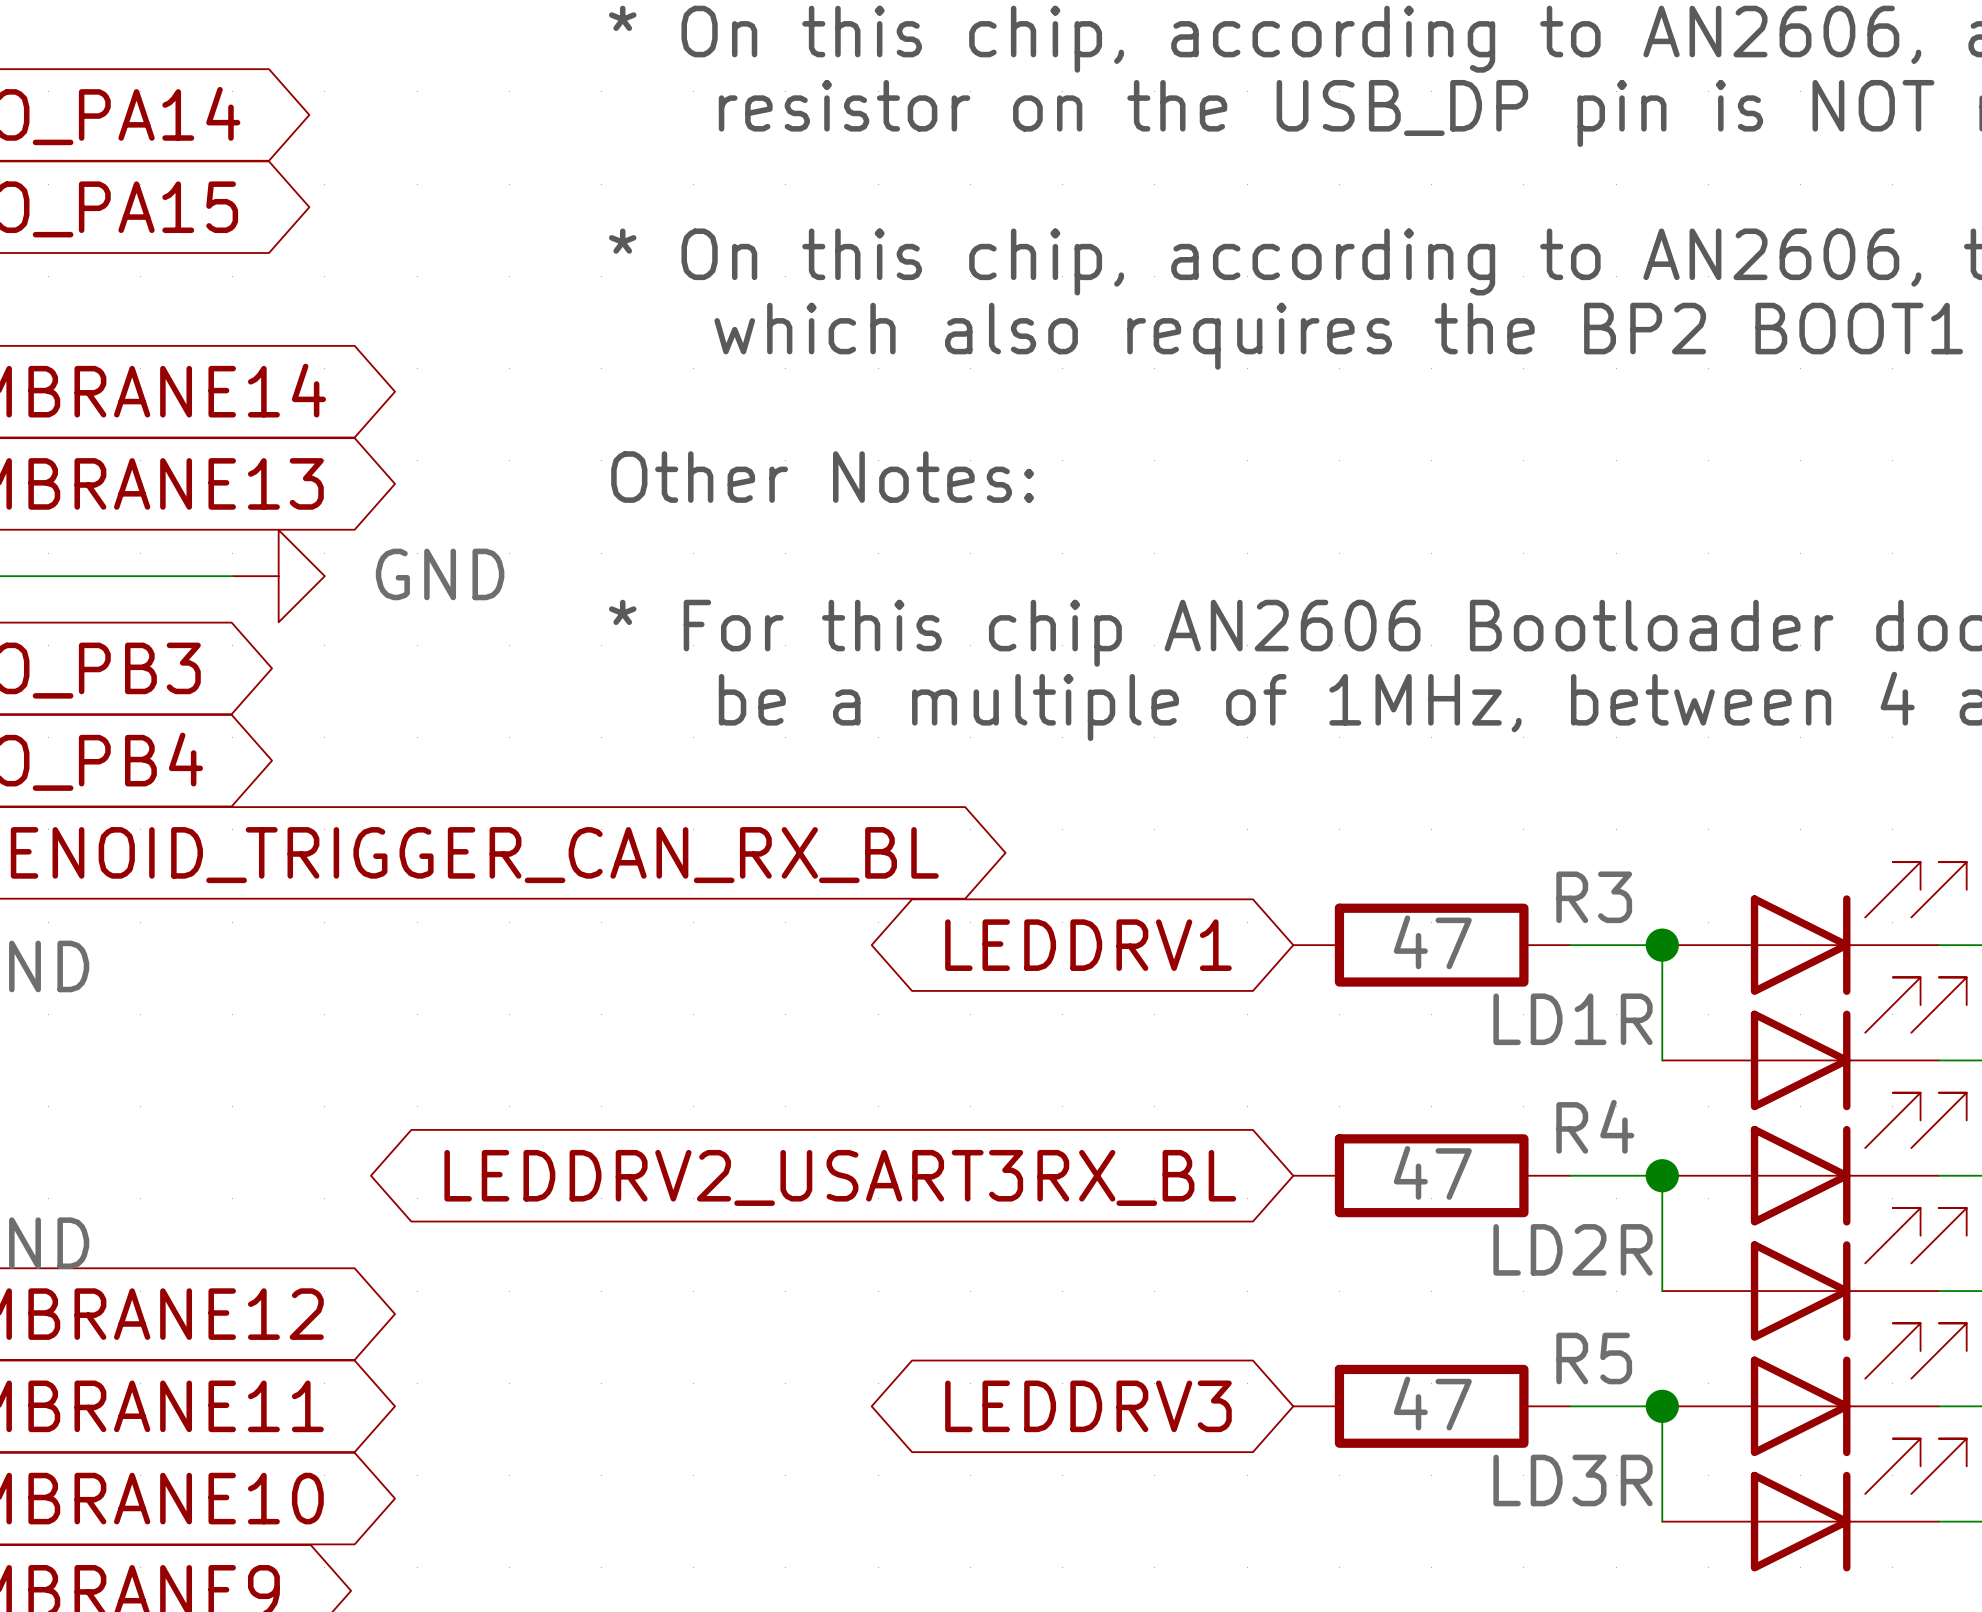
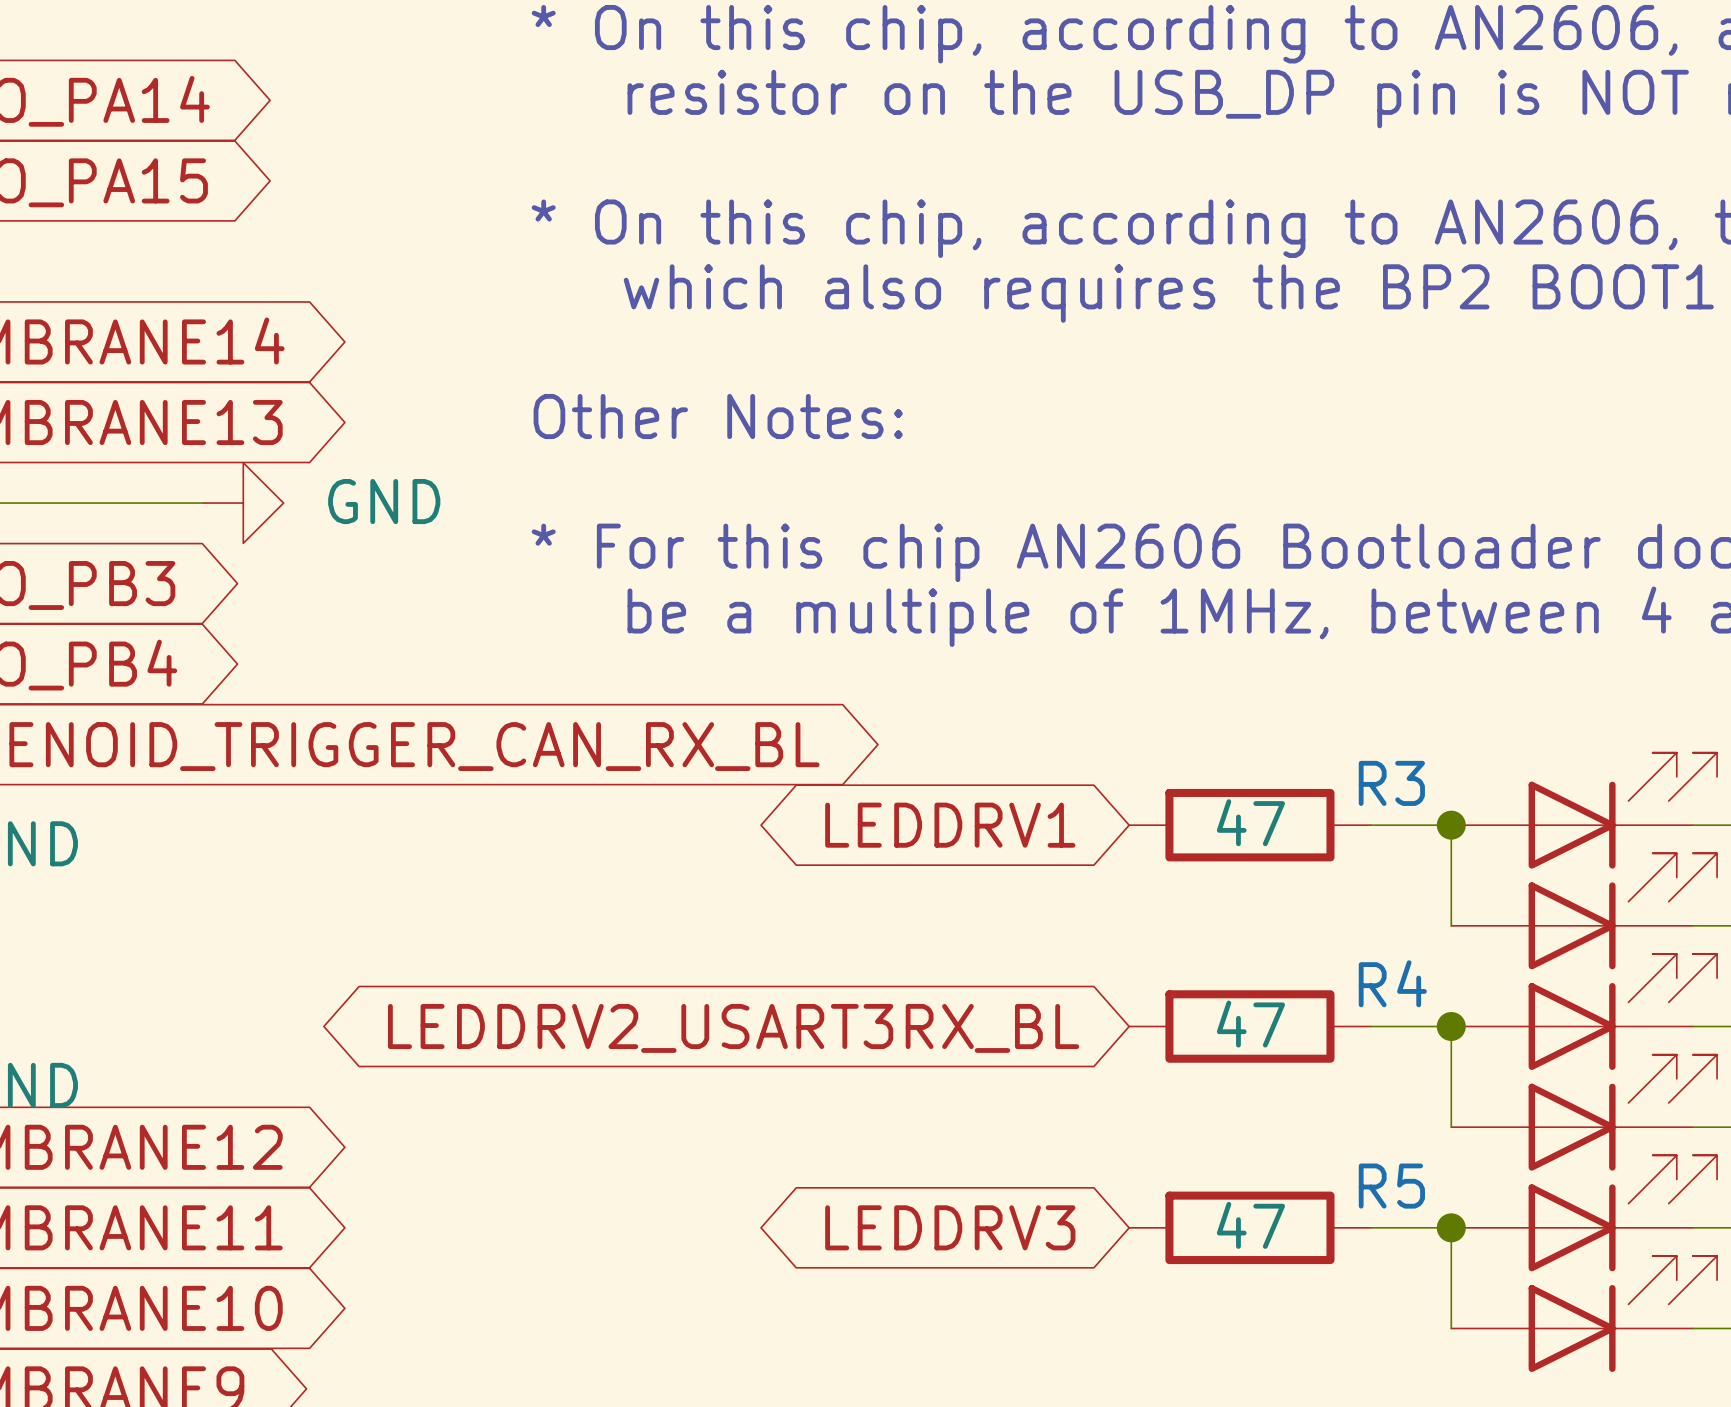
label: LD1R (1572, 1019) -> none
label: LD2R (1572, 1249) -> none
label: LD3R (1572, 1480) -> none

